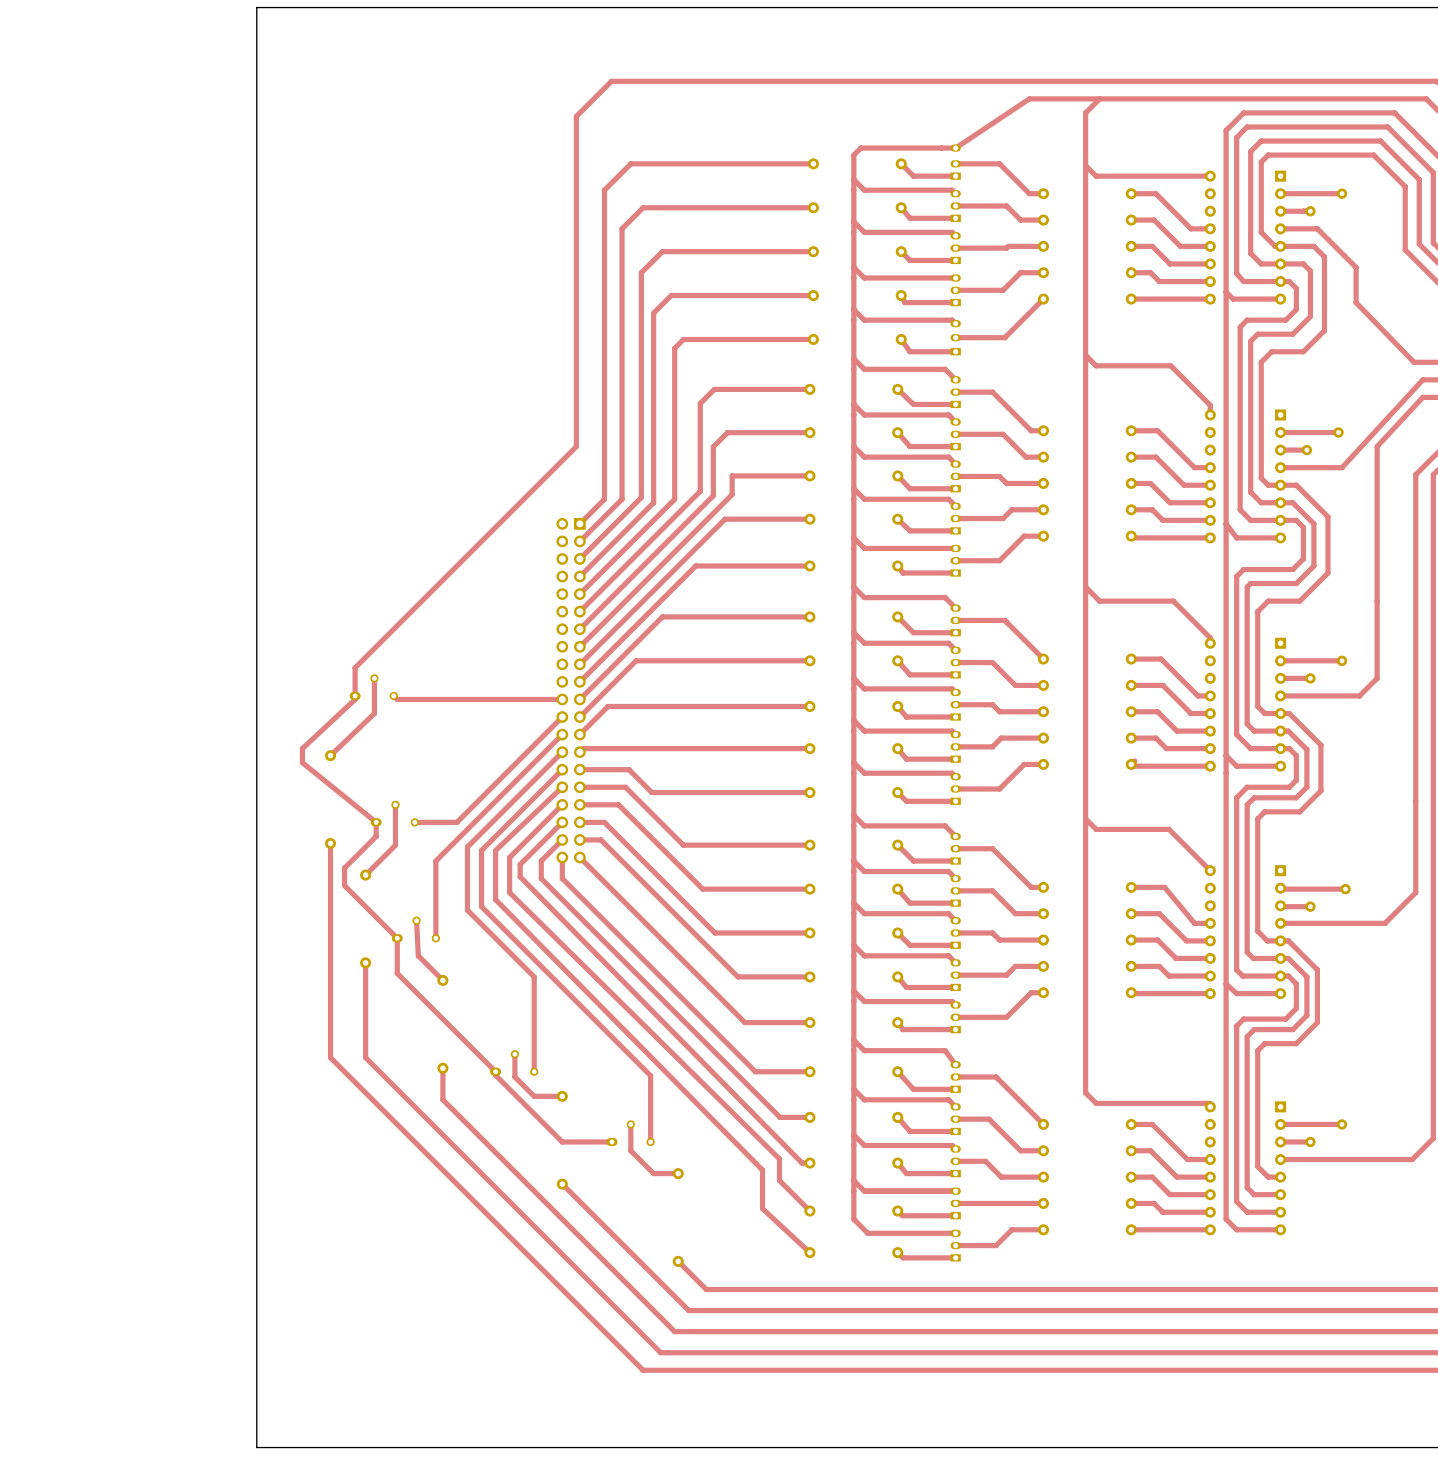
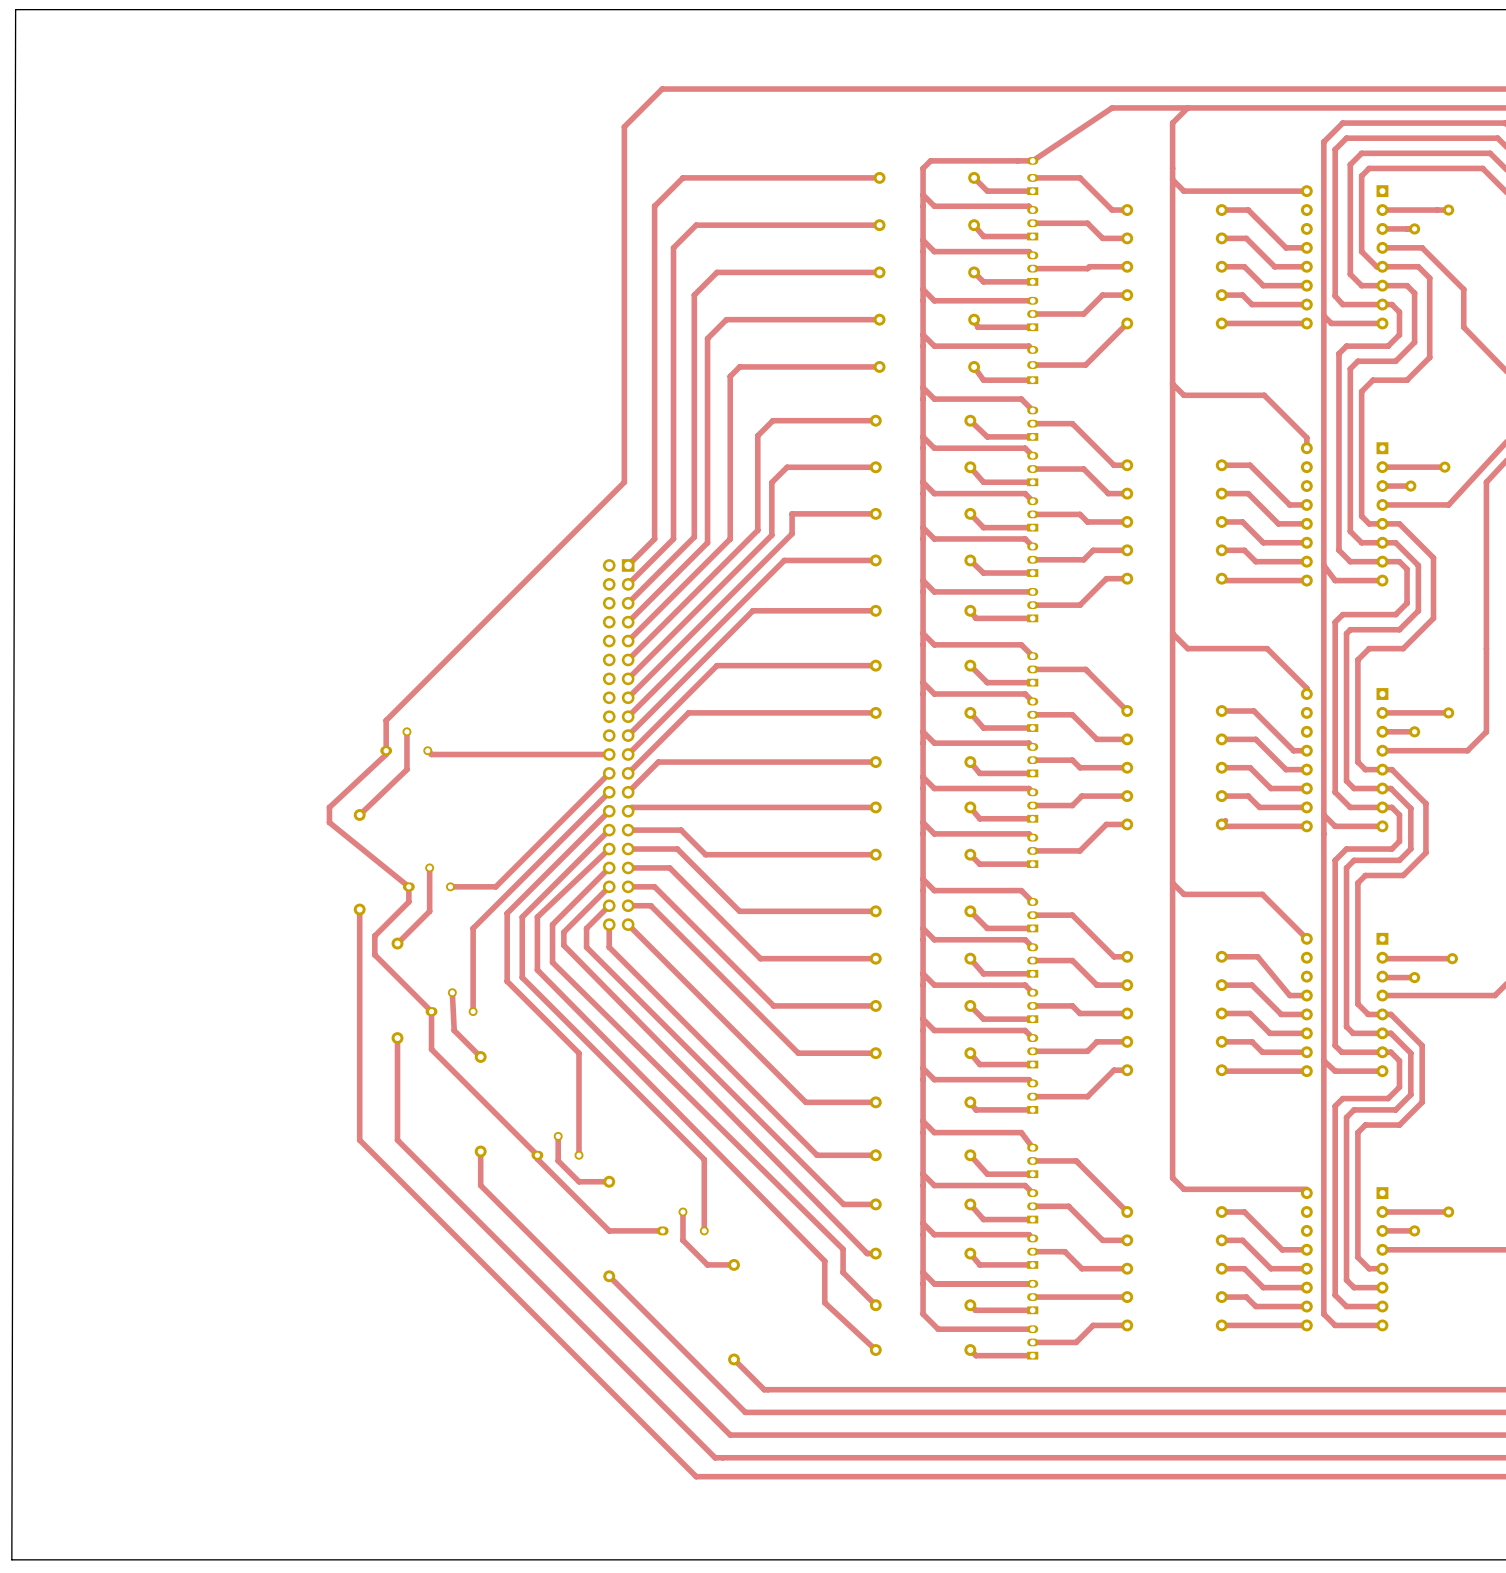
board edge: (256, 7) (256, 1447) -> (280, 9) (15, 9) (11, 1559) (280, 1559)

